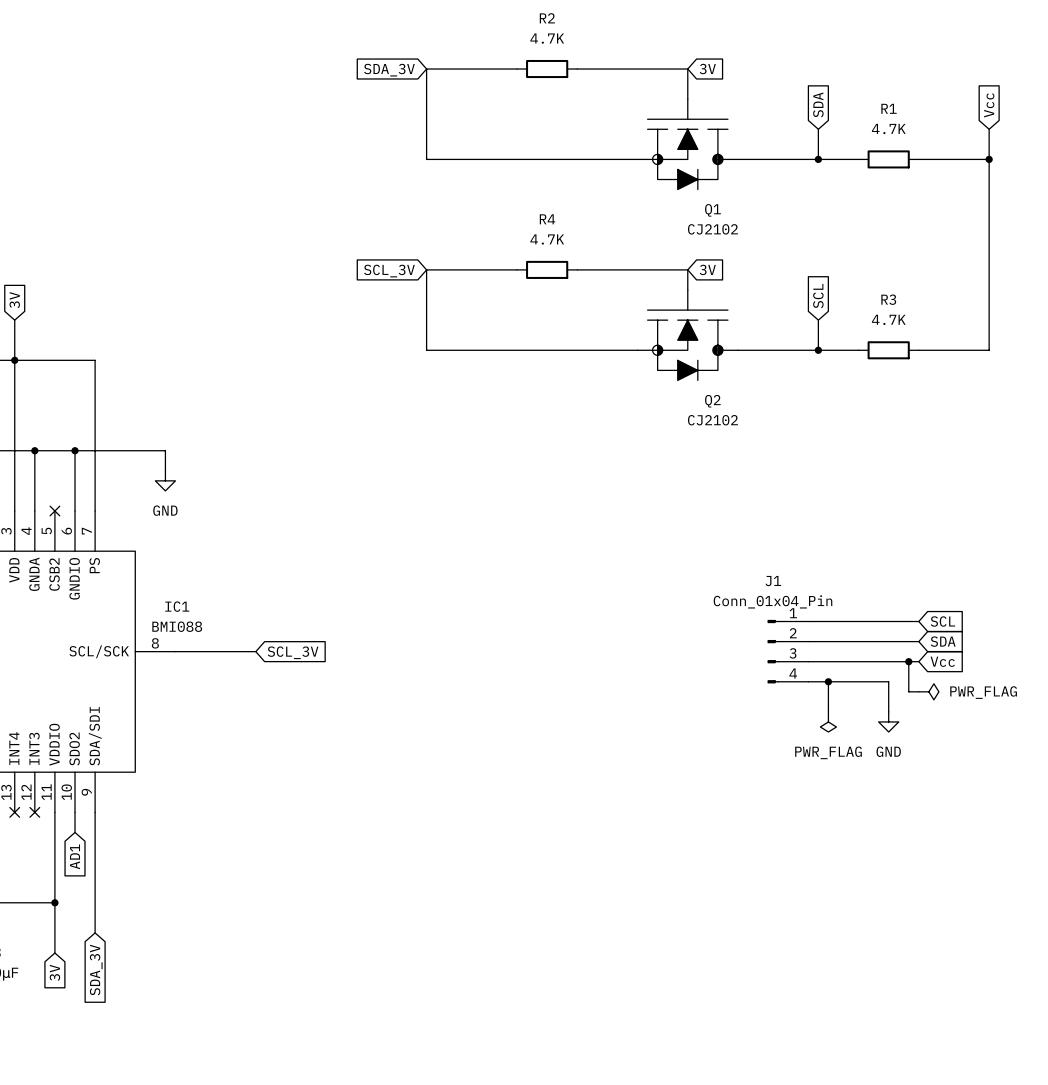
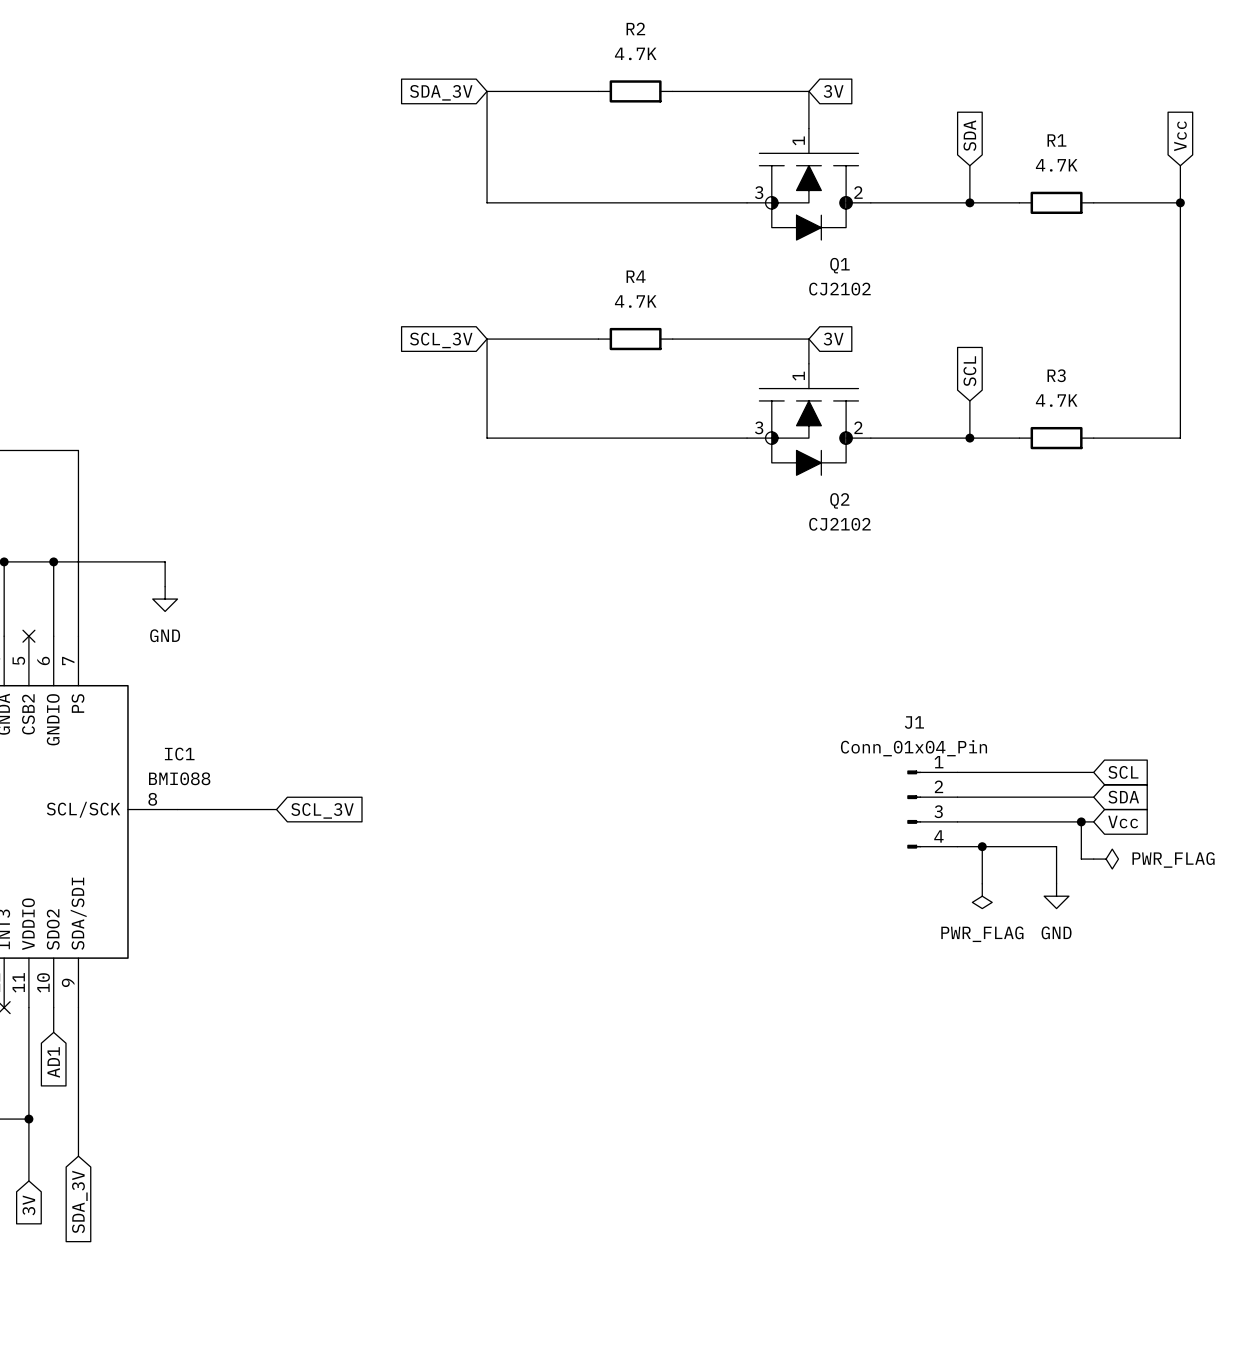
Q1 pin number: none -> 1 (798, 140)
Q1 pin number: none -> 3 (759, 192)
Q1 pin number: none -> 2 (858, 192)
Q2 pin number: none -> 1 (798, 376)
Q2 pin number: none -> 3 (759, 427)
Q2 pin number: none -> 2 (858, 427)

